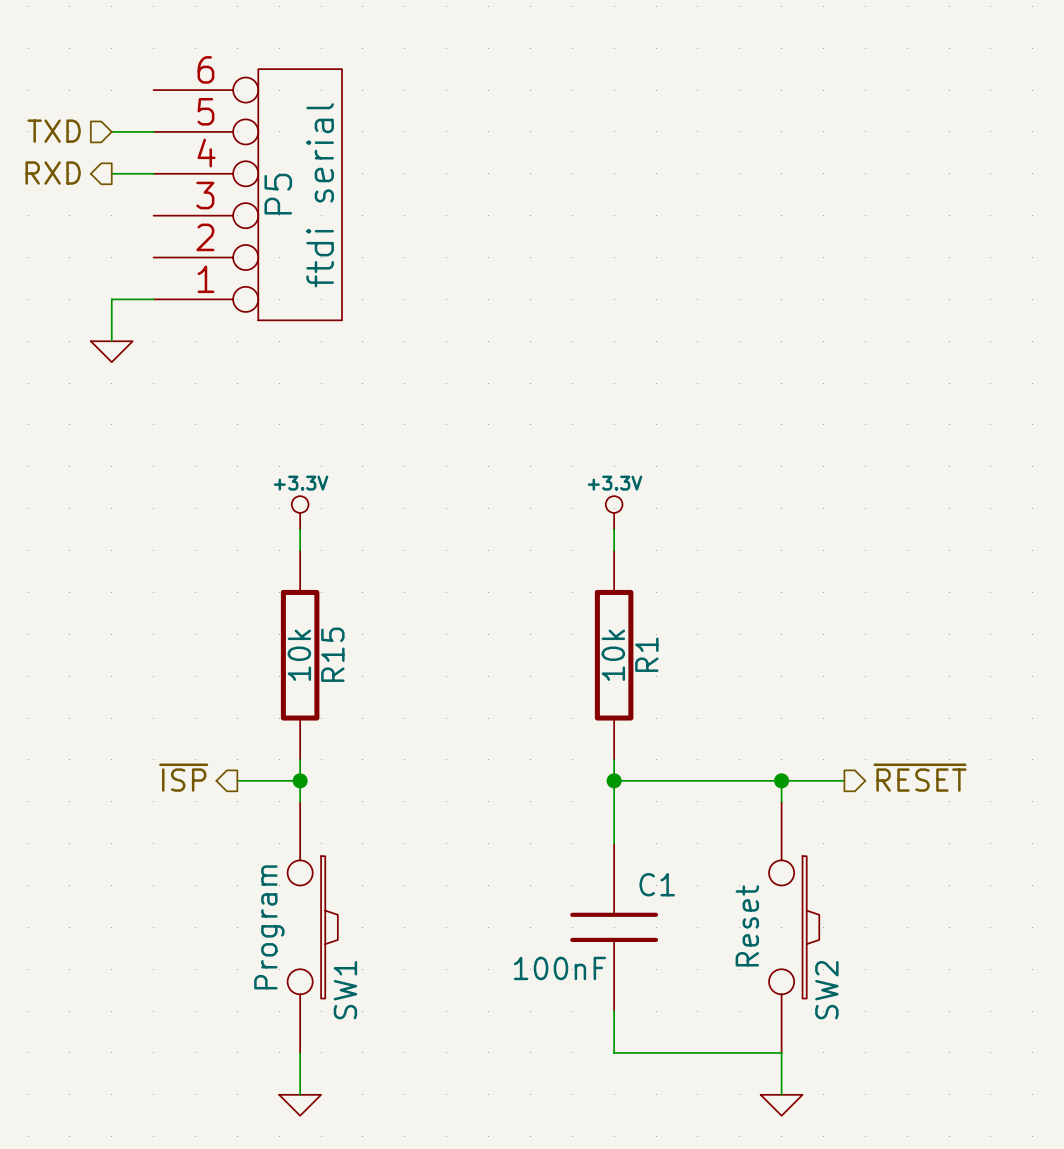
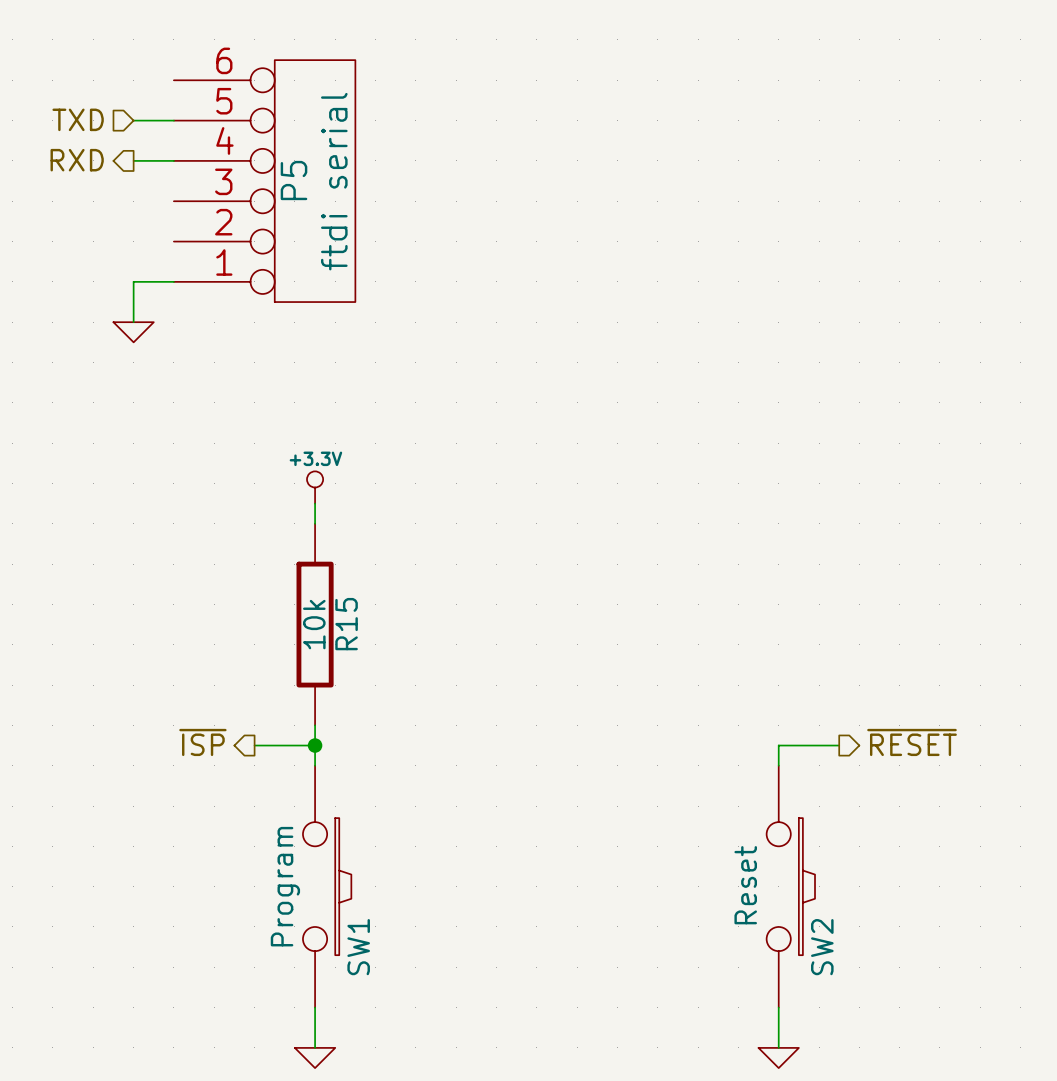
power symbol: +3.3V (614, 512) -> none
wire: (614, 529) (614, 550) -> none
R1: 10k (614, 655) -> none
wire: (614, 759) (614, 843) -> none
wire: (614, 780) (781, 780) -> none
junction: (614, 780) -> none
junction: (781, 780) -> none
C1: 100nF (614, 927) -> none
wire: (614, 1011) (614, 1052) (781, 1052) -> none

